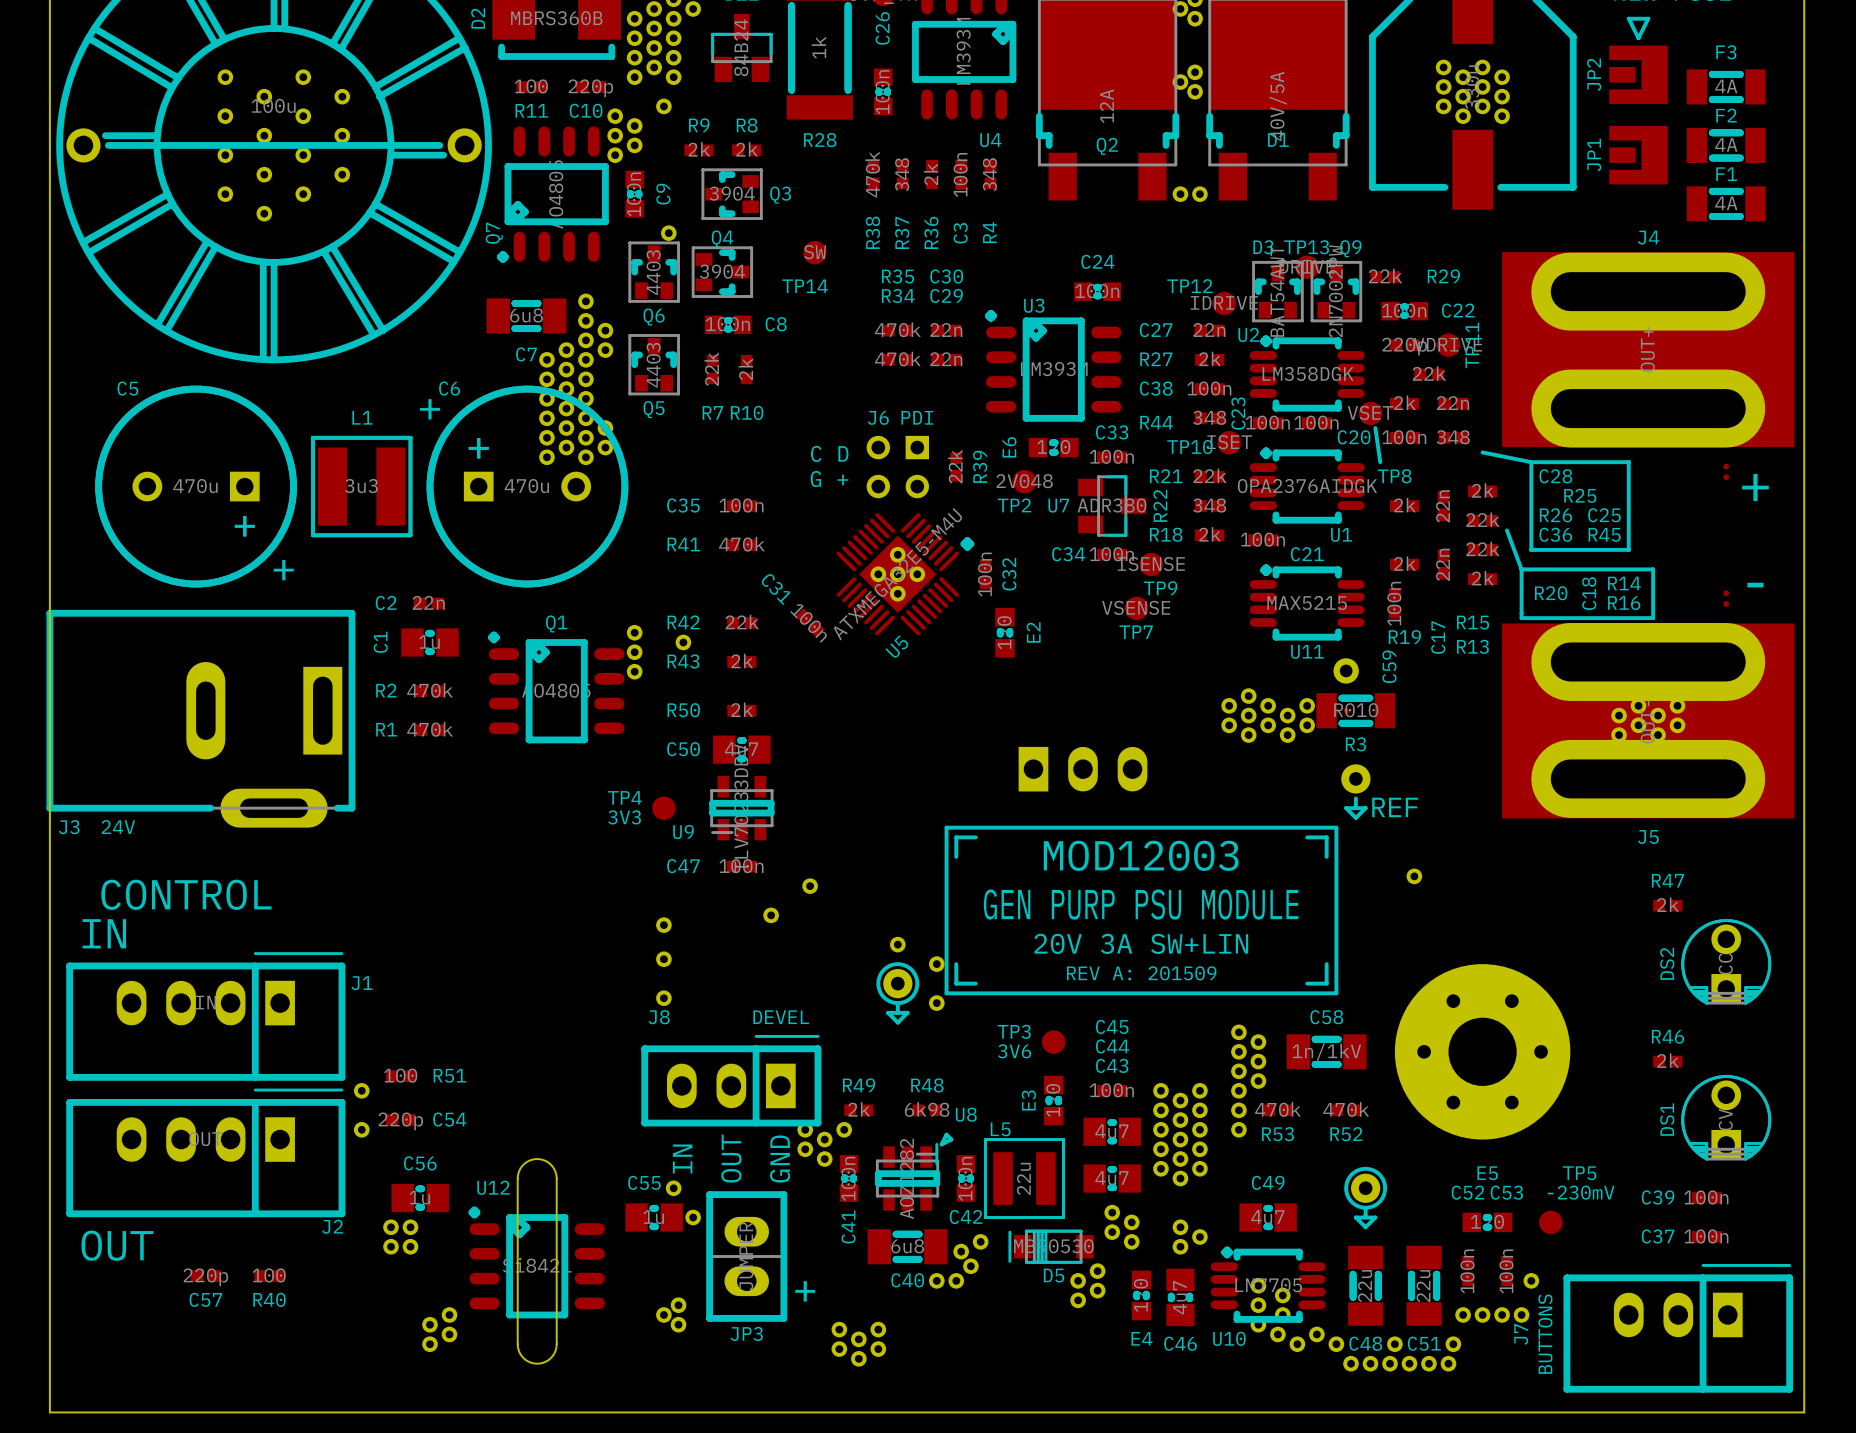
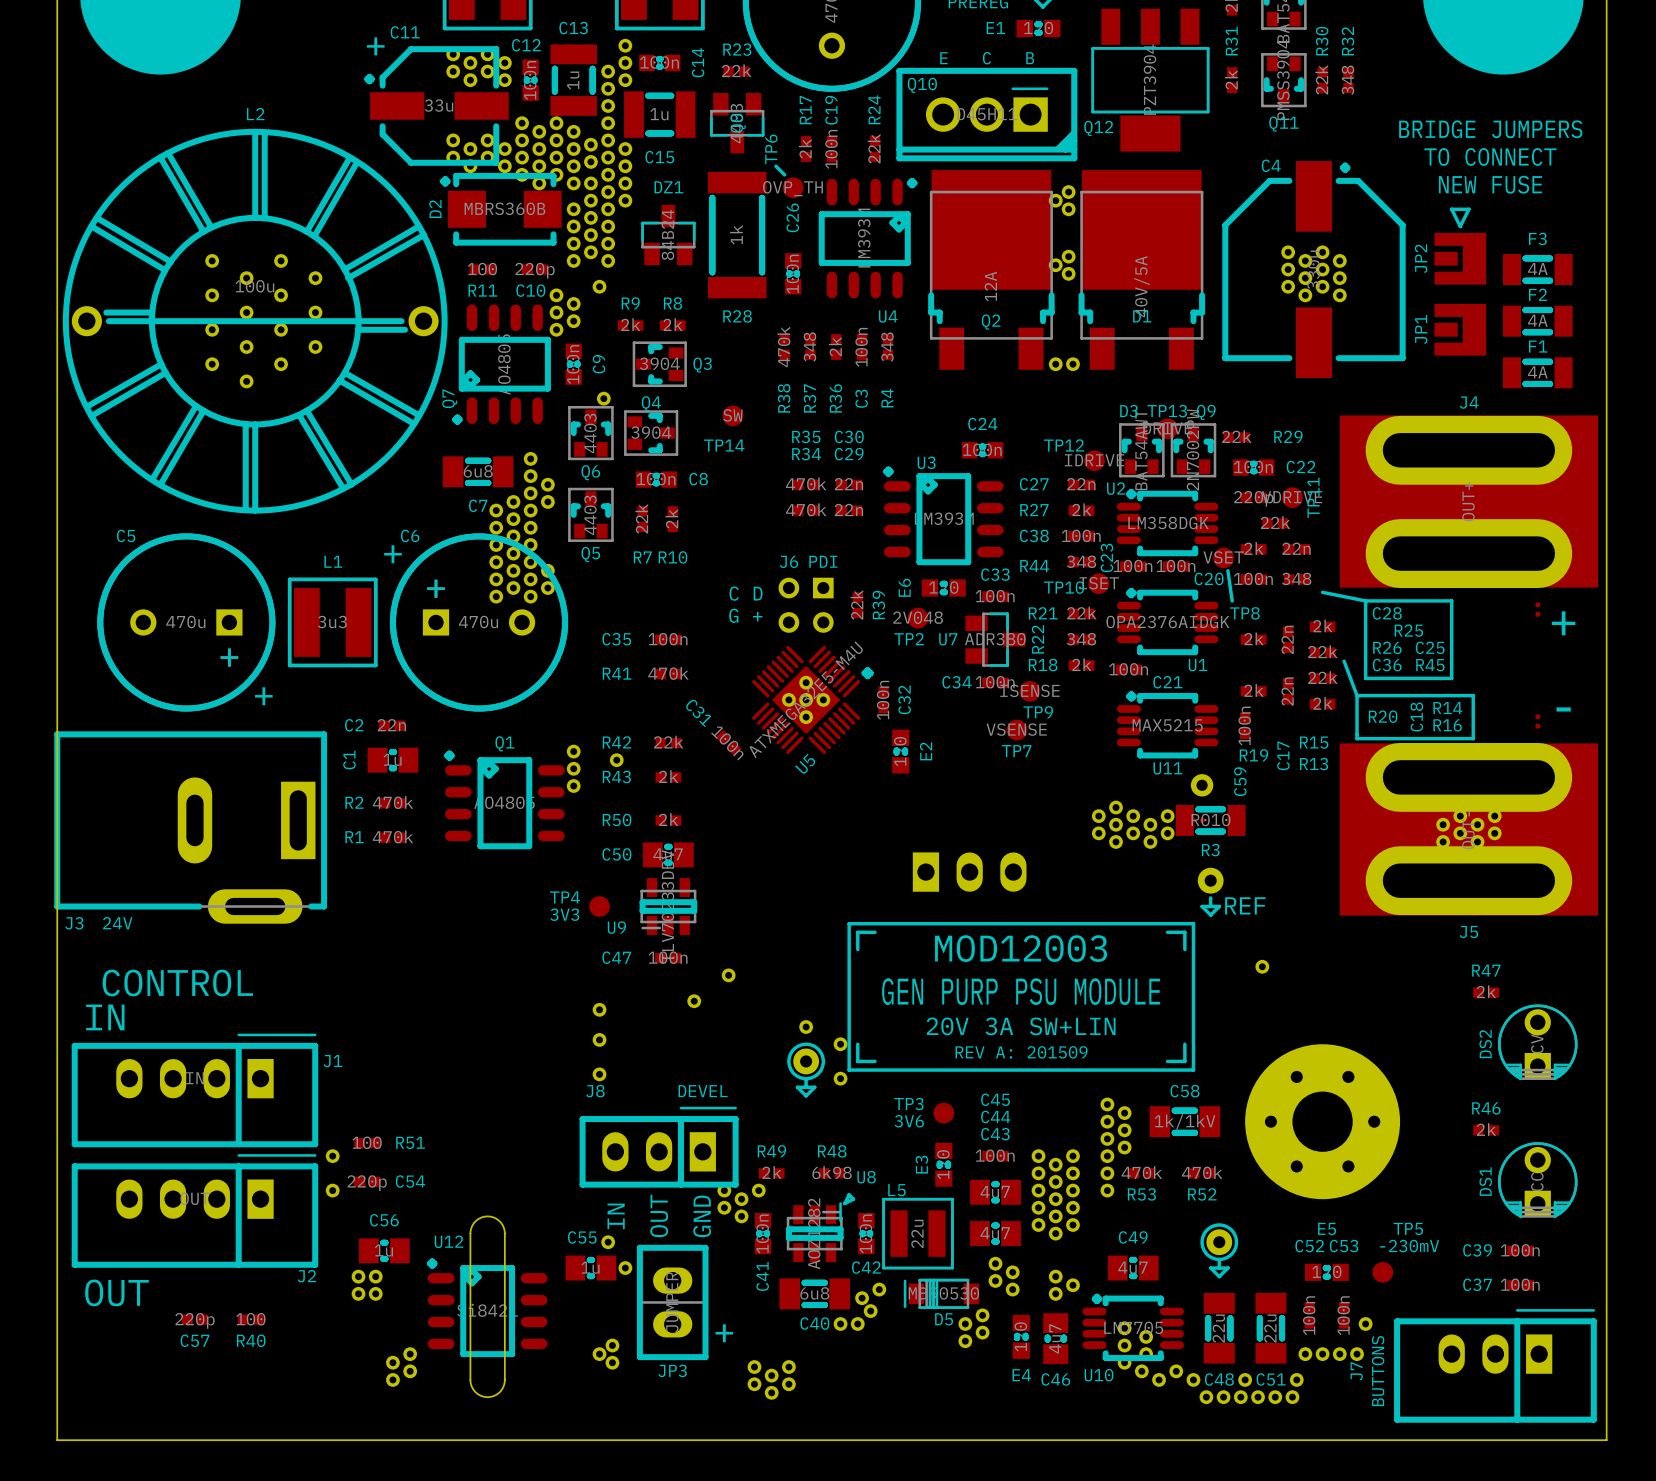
DS2 value: CC (1725, 964) -> CV (1537, 1043)
C58 value: 1n/1kV (1326, 1052) -> 1k/1kV (1185, 1121)
DS1 value: CV (1725, 1119) -> CC (1537, 1181)

